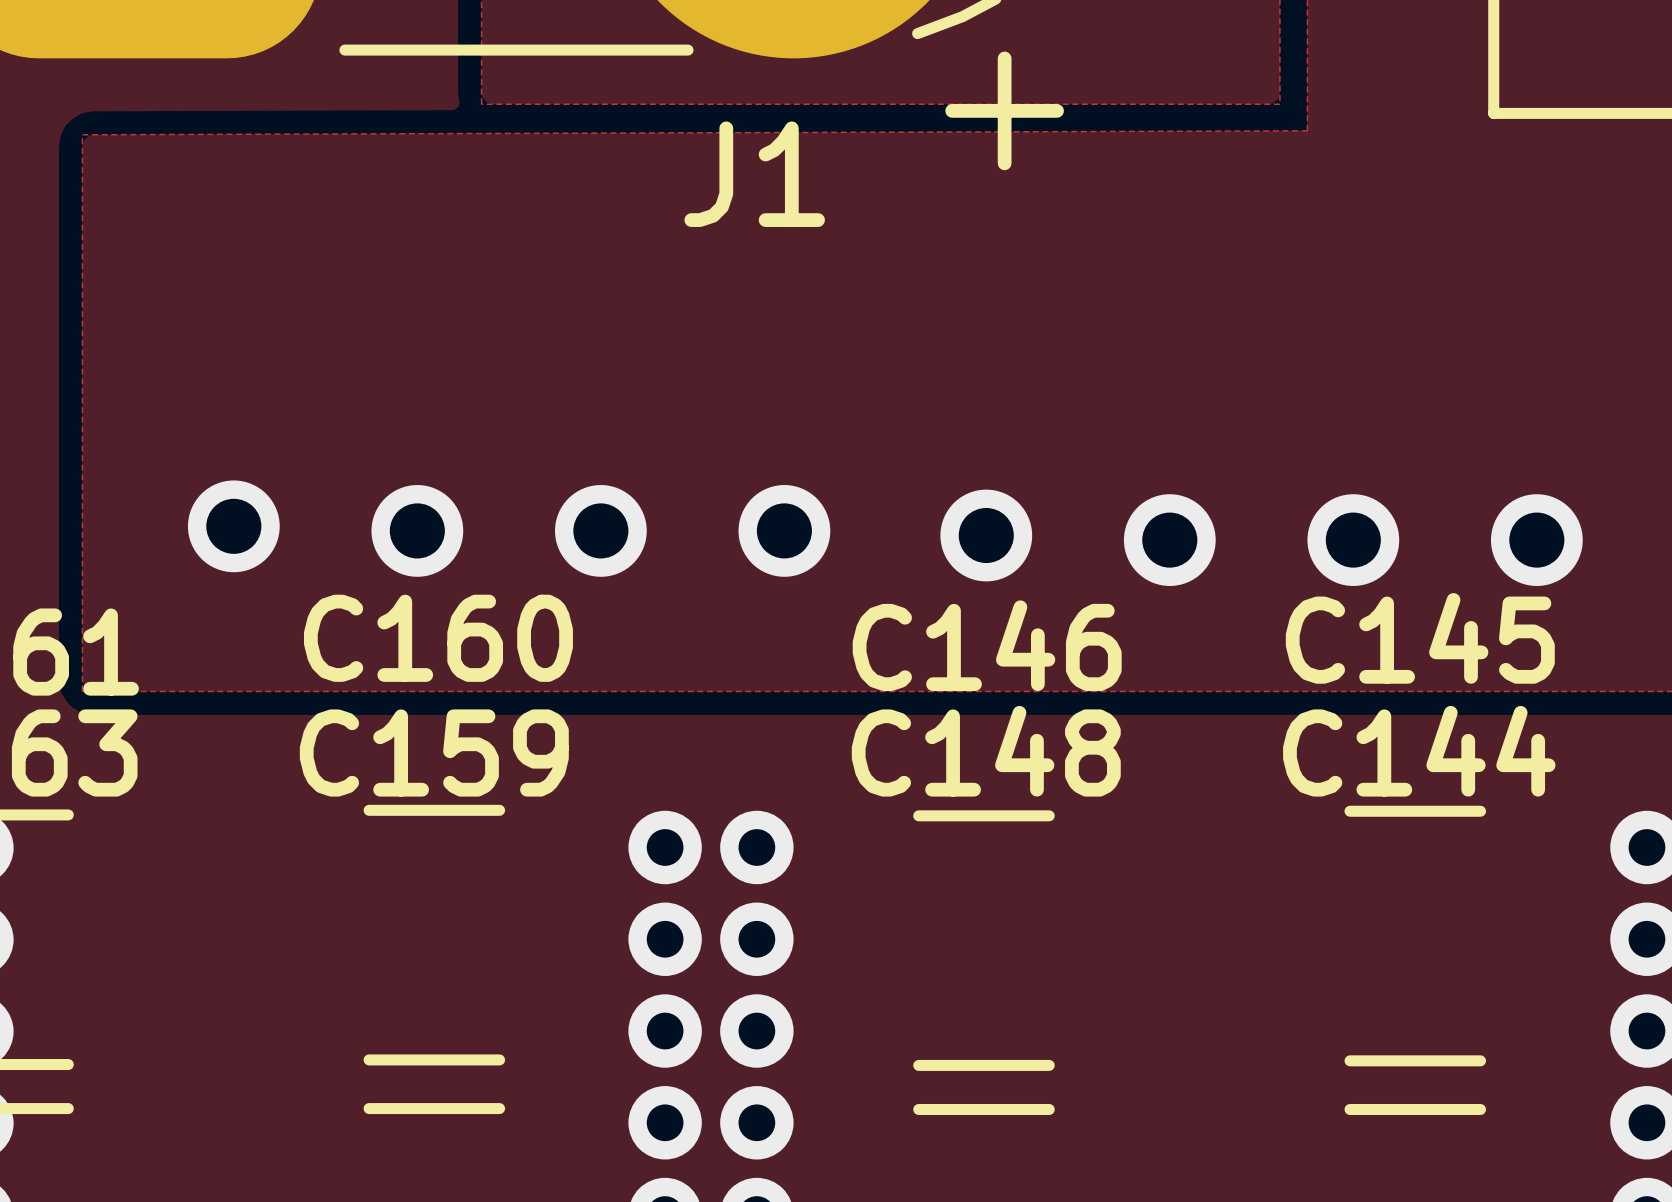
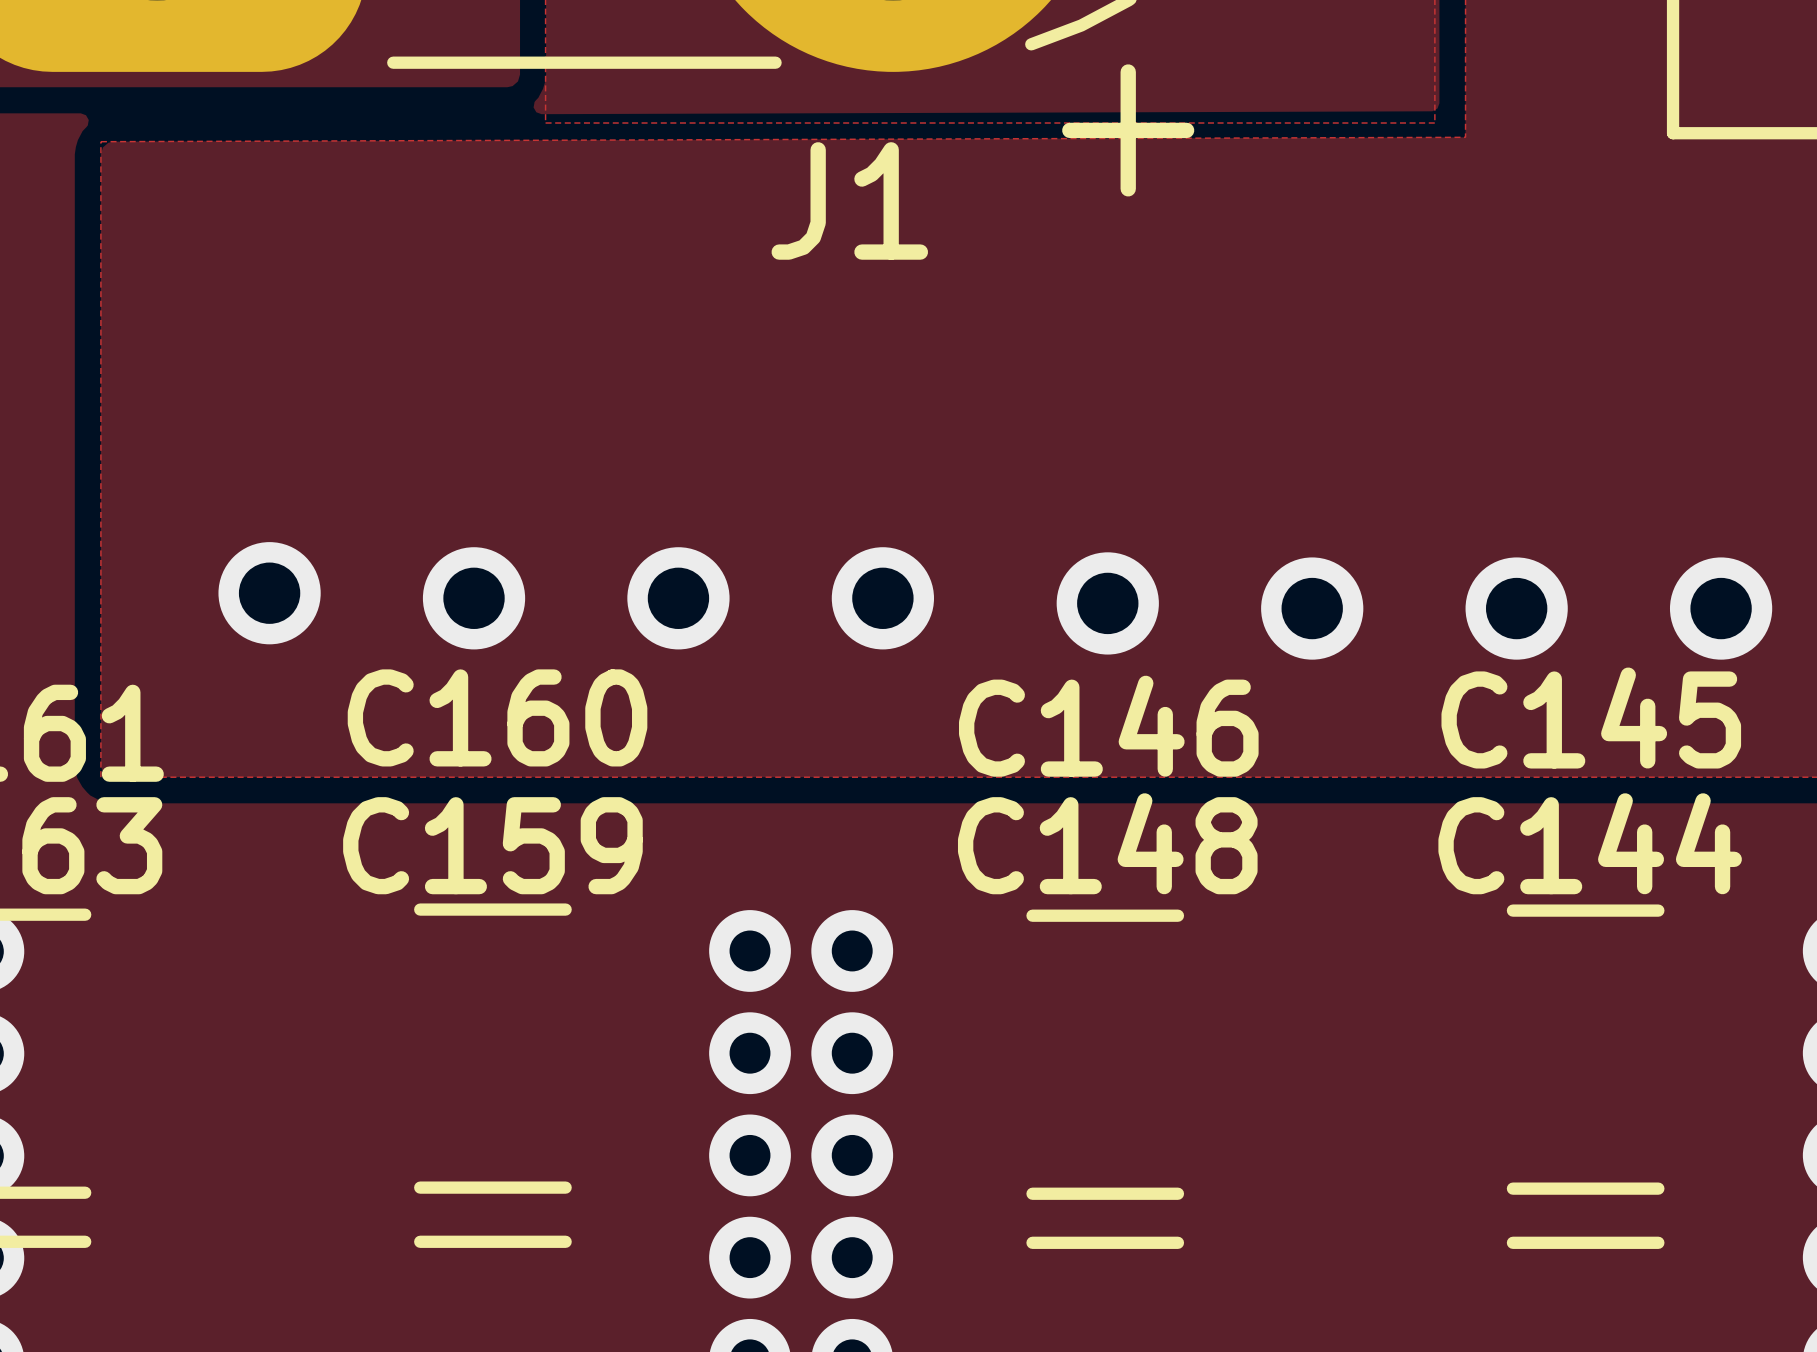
zone outline: (1307, 117) (1307, 130) (82, 134) -> (1465, 137) (100, 141) (100, 157)

